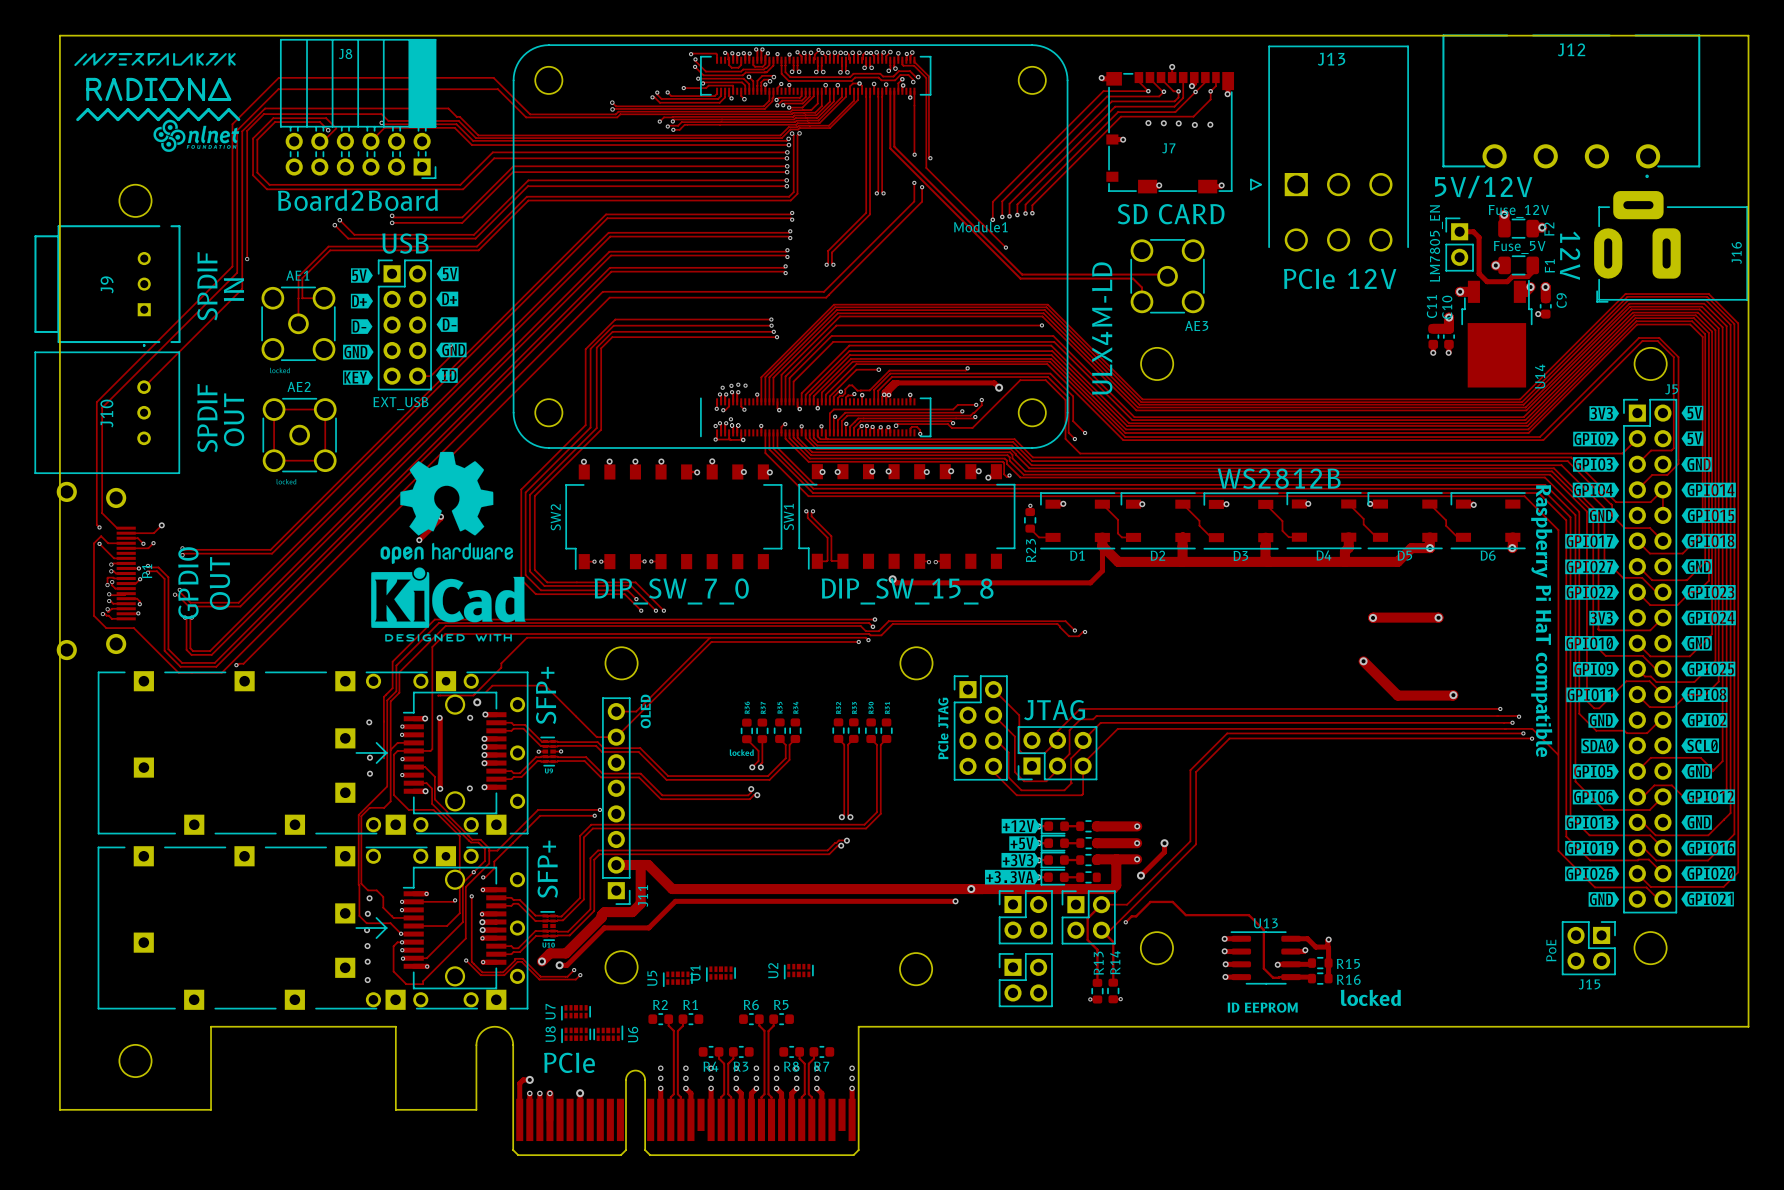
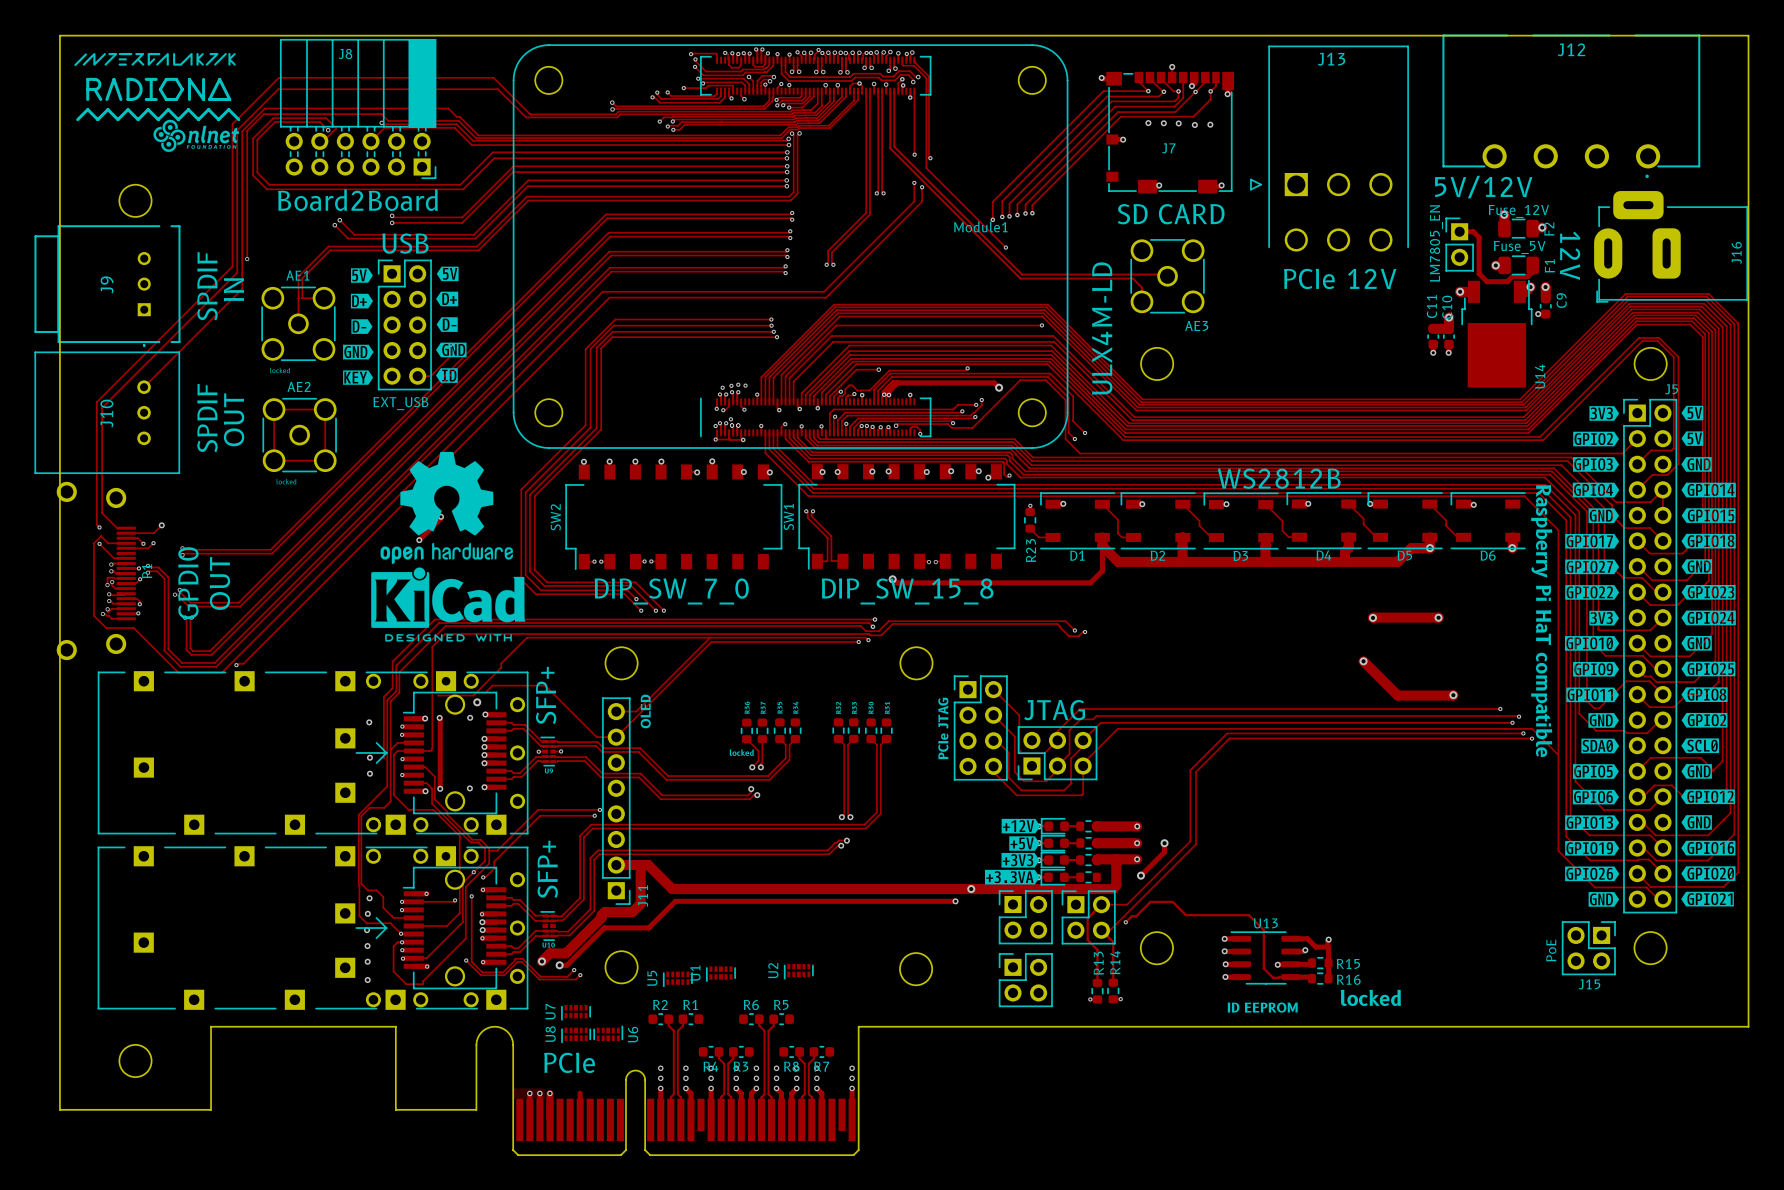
track: (529, 1079) (523, 1079) (519, 1083) (519, 1119) -> none
via: (529, 1079) -> none
via: (580, 1093) -> none

